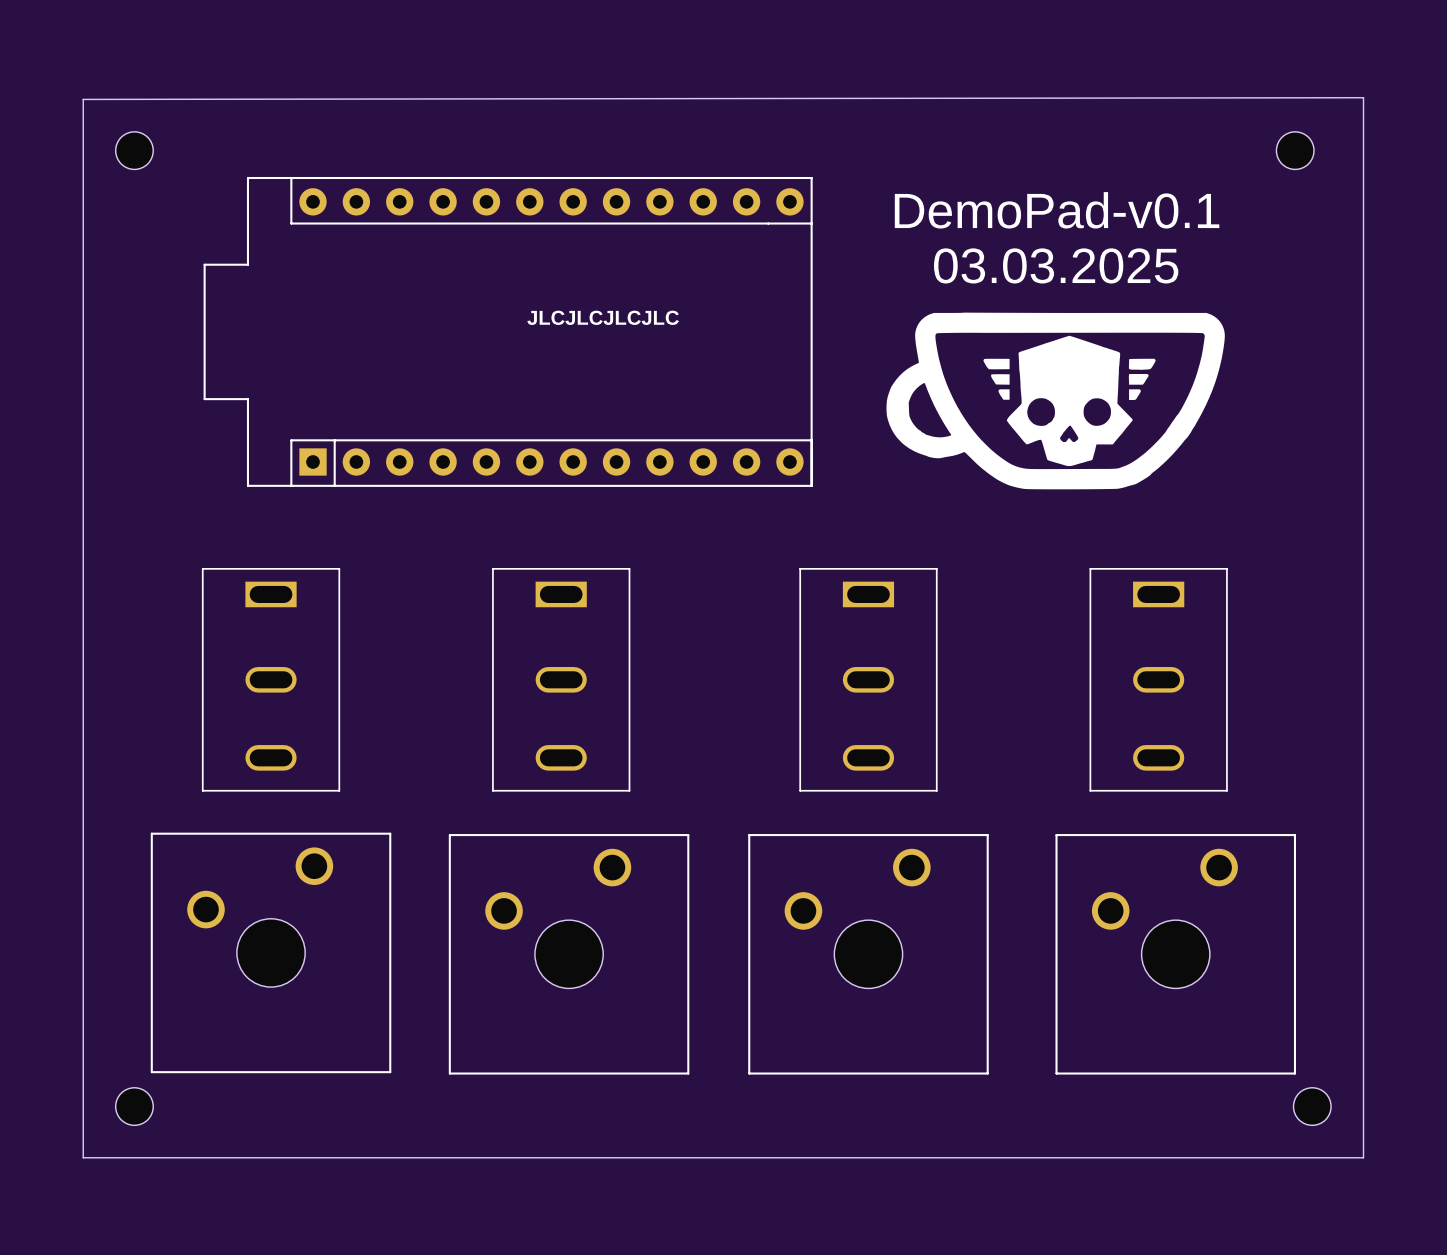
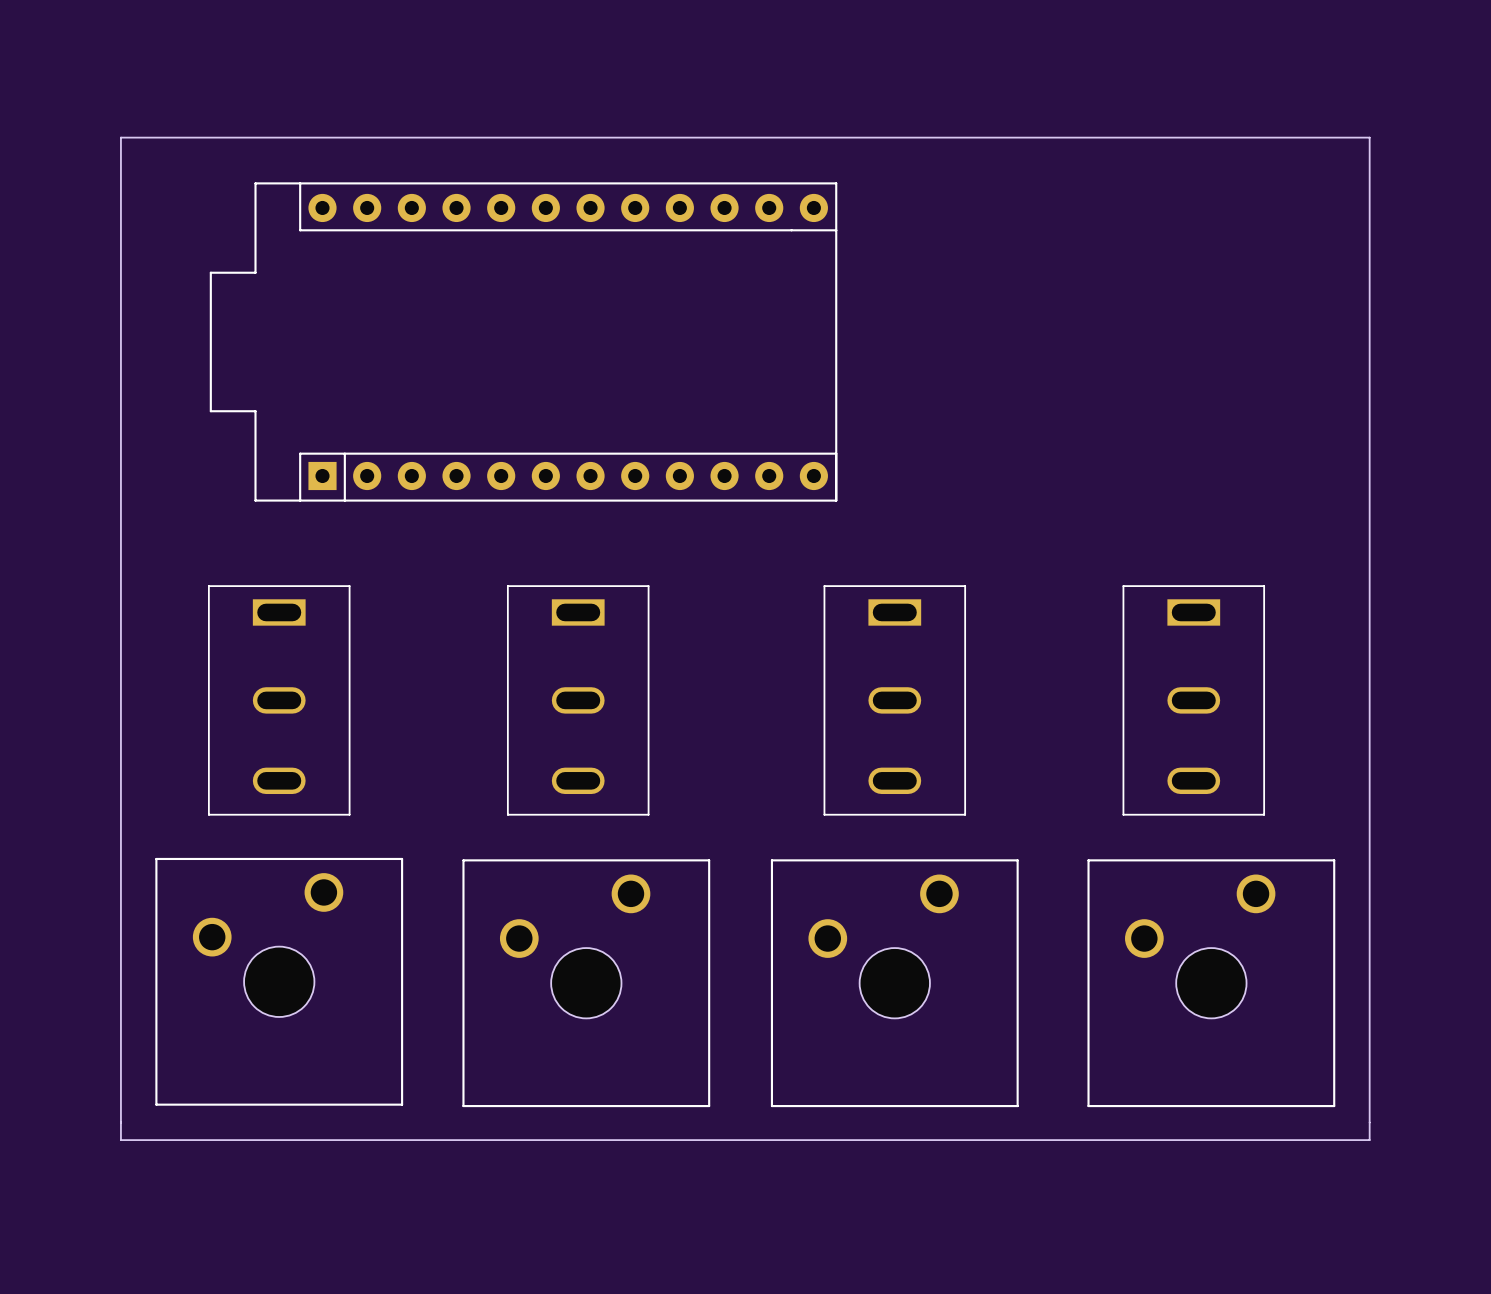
board edge: (1363, 97) (1363, 1157) (83, 1157) (83, 99) (1363, 97) -> (120, 137) (120, 1140) (1369, 1140) (1369, 137) (120, 137)
part: (134, 150) -> none
part: (1295, 150) -> none
text: DemoPad-v0.1 (1057, 210) -> none
text: 03.03.2025 (1056, 265) -> none
drawing: [886, 312, 1225, 490] -> none
text: JLCJLCJLCJLC (603, 317) -> none
part: (134, 1106) -> none
part: (1312, 1106) -> none

